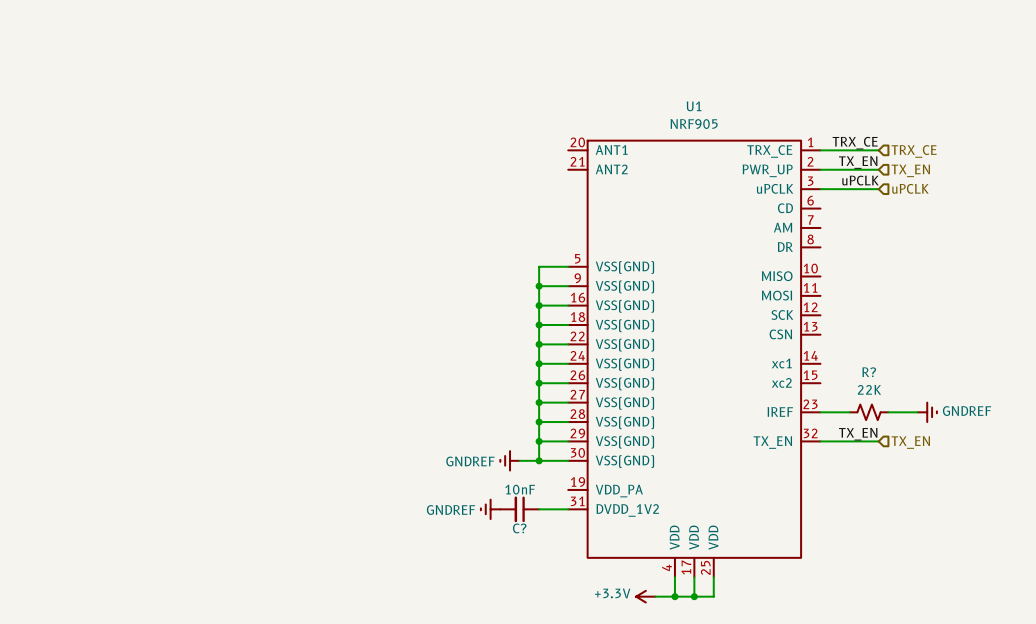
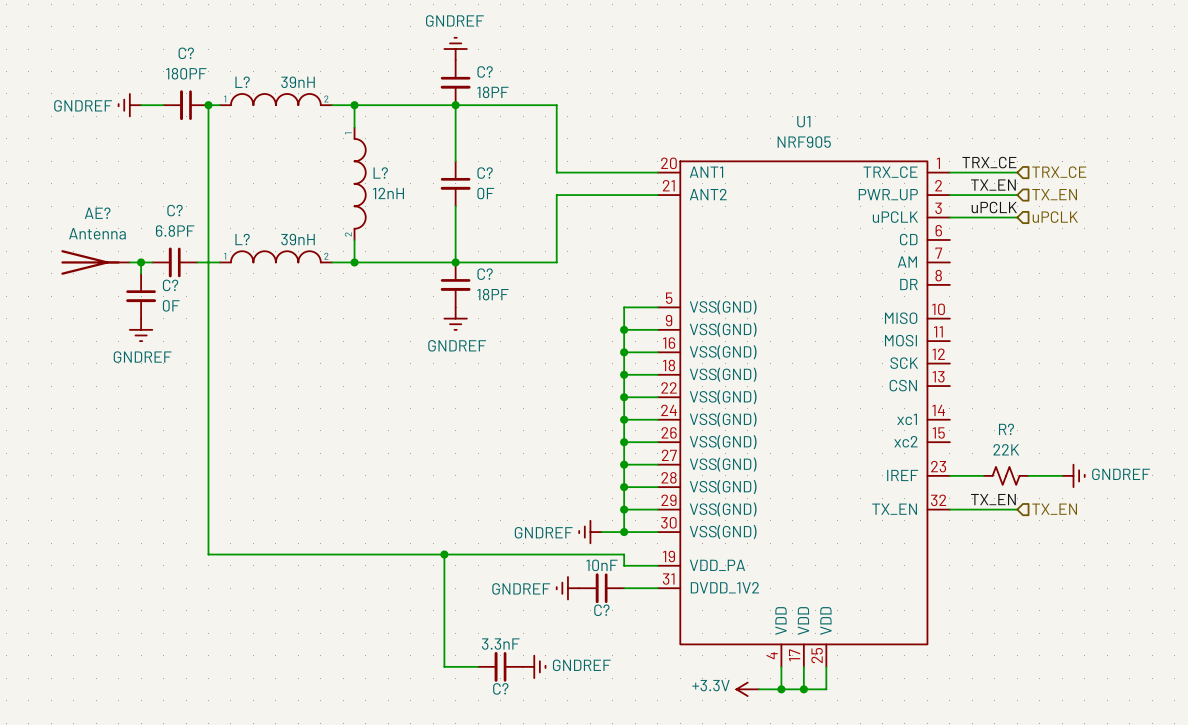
power symbol: none -> GNDREF (455, 49)
C?: none -> 18PF (455, 82)
L?: none -> 39nH (275, 99)
power symbol: none -> GNDREF (129, 105)
wire: none -> (141, 105) (163, 105)
C?: none -> 180PF (186, 105)
junction: none -> (208, 105)
wire: none -> (219, 105) (208, 105) (208, 554) (624, 554) (624, 565) (657, 565)
wire: none -> (332, 105) (556, 105) (556, 172) (657, 172)
wire: none -> (354, 105) (354, 127)
junction: none -> (354, 105)
wire: none -> (455, 105) (455, 161)
junction: none -> (455, 105)
L?: none -> 12nH (360, 183)
C?: none -> 0F (455, 183)
wire: none -> (657, 195) (556, 195) (556, 262) (332, 262)
wire: none -> (455, 206) (455, 262)
wire: none -> (354, 239) (354, 262)
L?: none -> 39nH (275, 256)
AE?: none -> Antenna (95, 262)
wire: none -> (129, 262) (152, 262)
wire: none -> (141, 262) (141, 273)
junction: none -> (141, 262)
C?: none -> 6.8PF (174, 262)
wire: none -> (197, 262) (219, 262)
junction: none -> (354, 262)
junction: none -> (455, 262)
C?: none -> 18PF (455, 284)
C?: none -> 0F (141, 296)
power symbol: none -> GNDREF (455, 318)
power symbol: none -> GNDREF (141, 329)
wire: none -> (444, 554) (444, 666) (478, 666)
junction: none -> (444, 554)
C?: none -> 3.3nF (500, 666)
power symbol: none -> GNDREF (534, 666)

